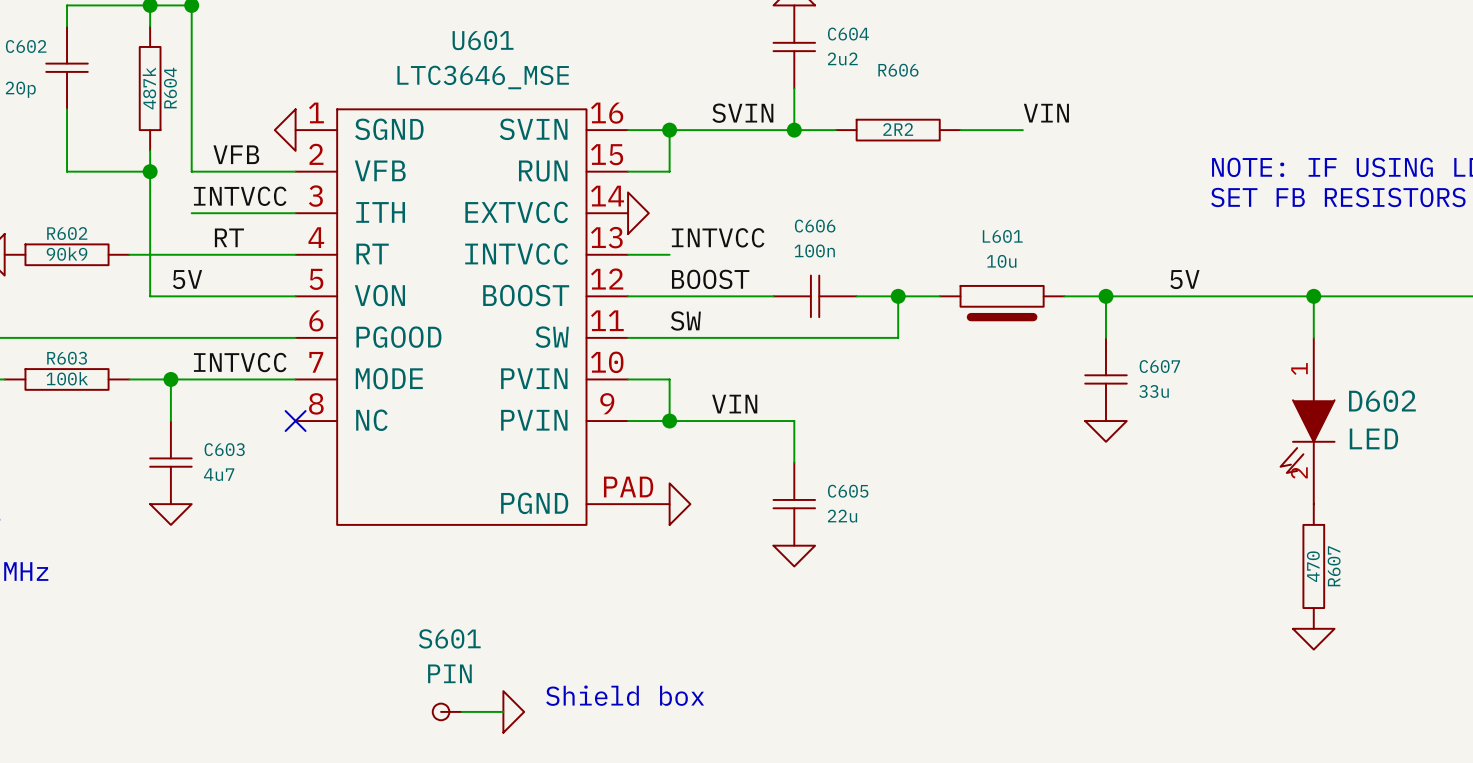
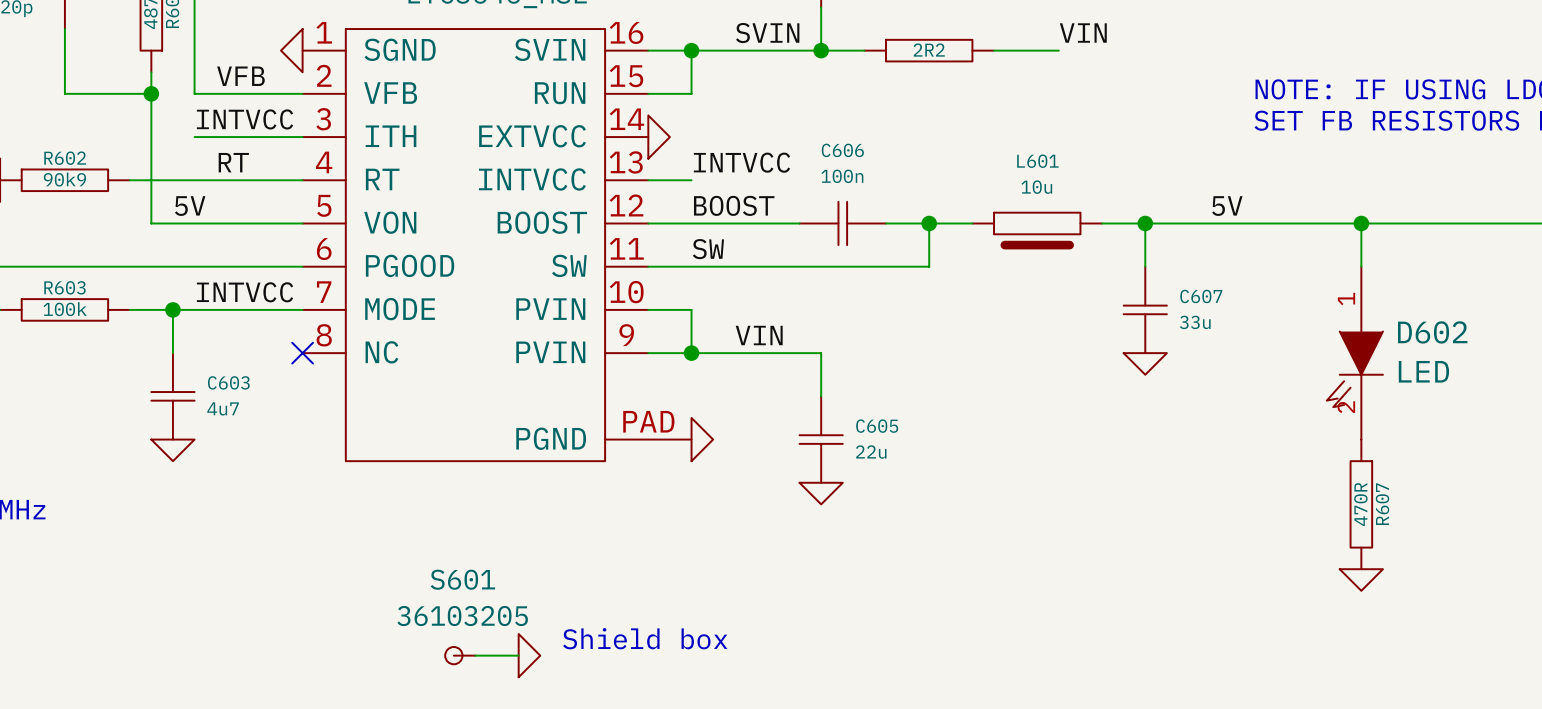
R607 value: 470 (1313, 566) -> 470R (1360, 504)
S601 value: PIN (449, 673) -> 36103205 (462, 616)

